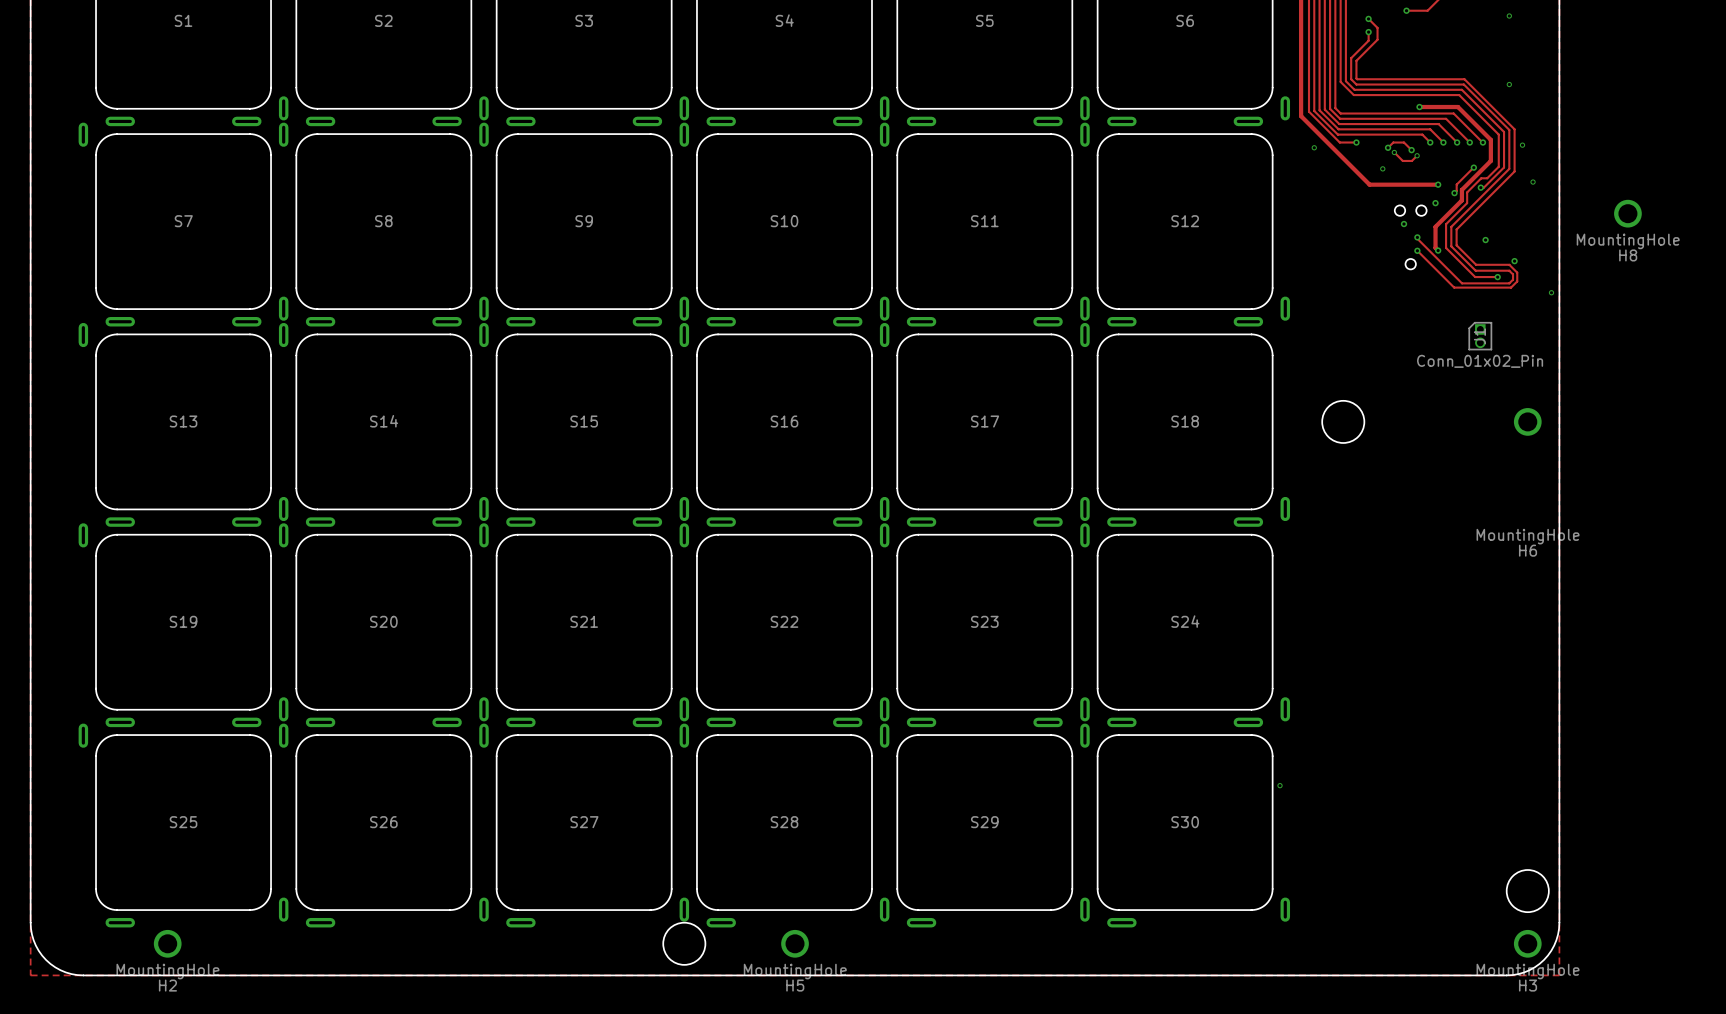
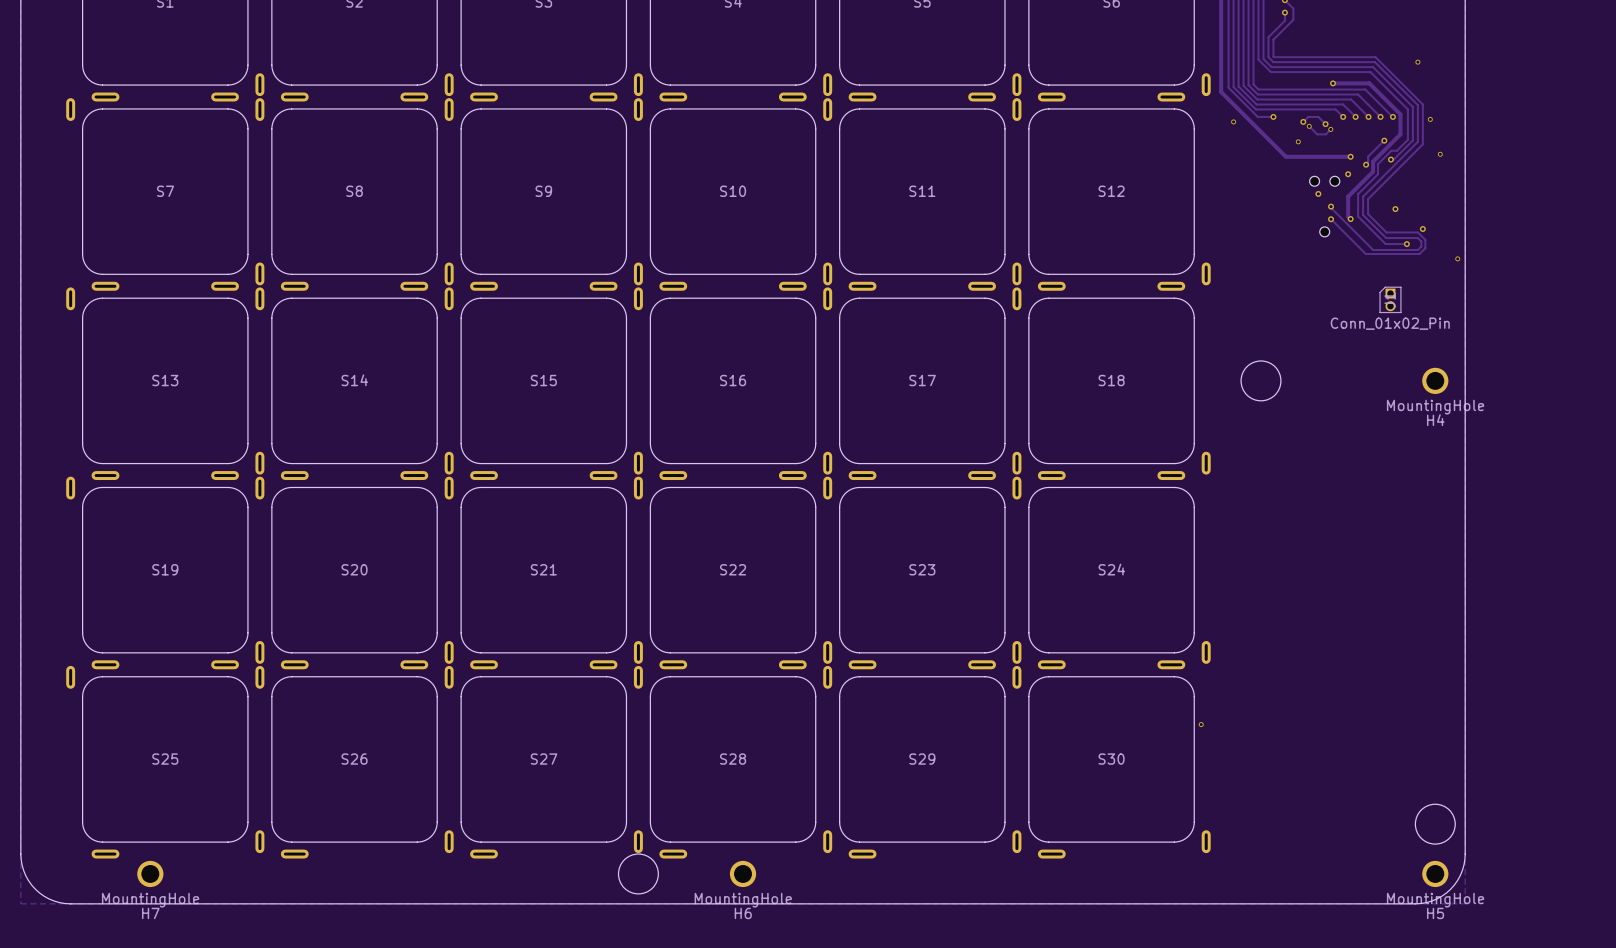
H8: MountingHole (1627, 213) -> none
H6 value position: MountingHole (1528, 536) -> MountingHole (1435, 407)
H6 name: H6 (1528, 550) -> H4 (1435, 420)
H2 name: H2 (167, 985) -> H7 (150, 913)
H5 name: H5 (795, 985) -> H6 (743, 913)
H3 name: H3 (1528, 985) -> H5 (1435, 913)

